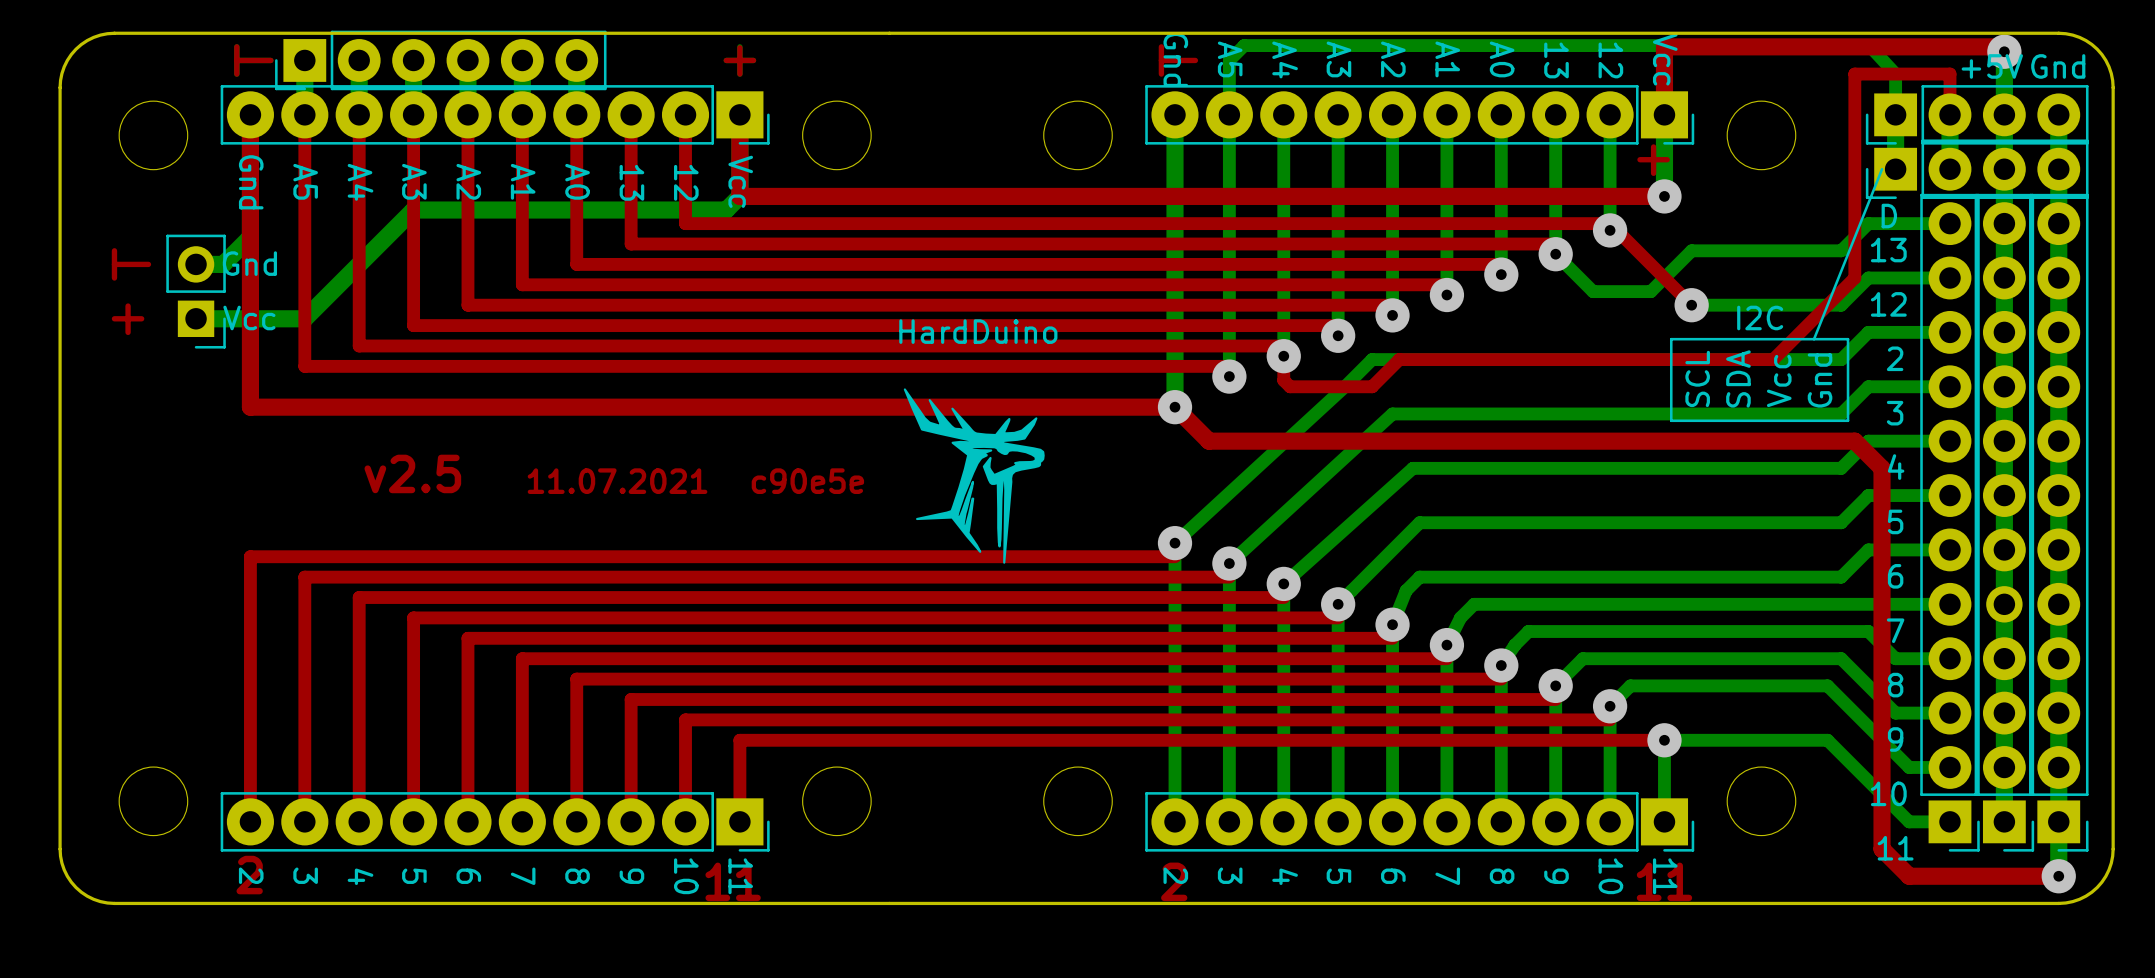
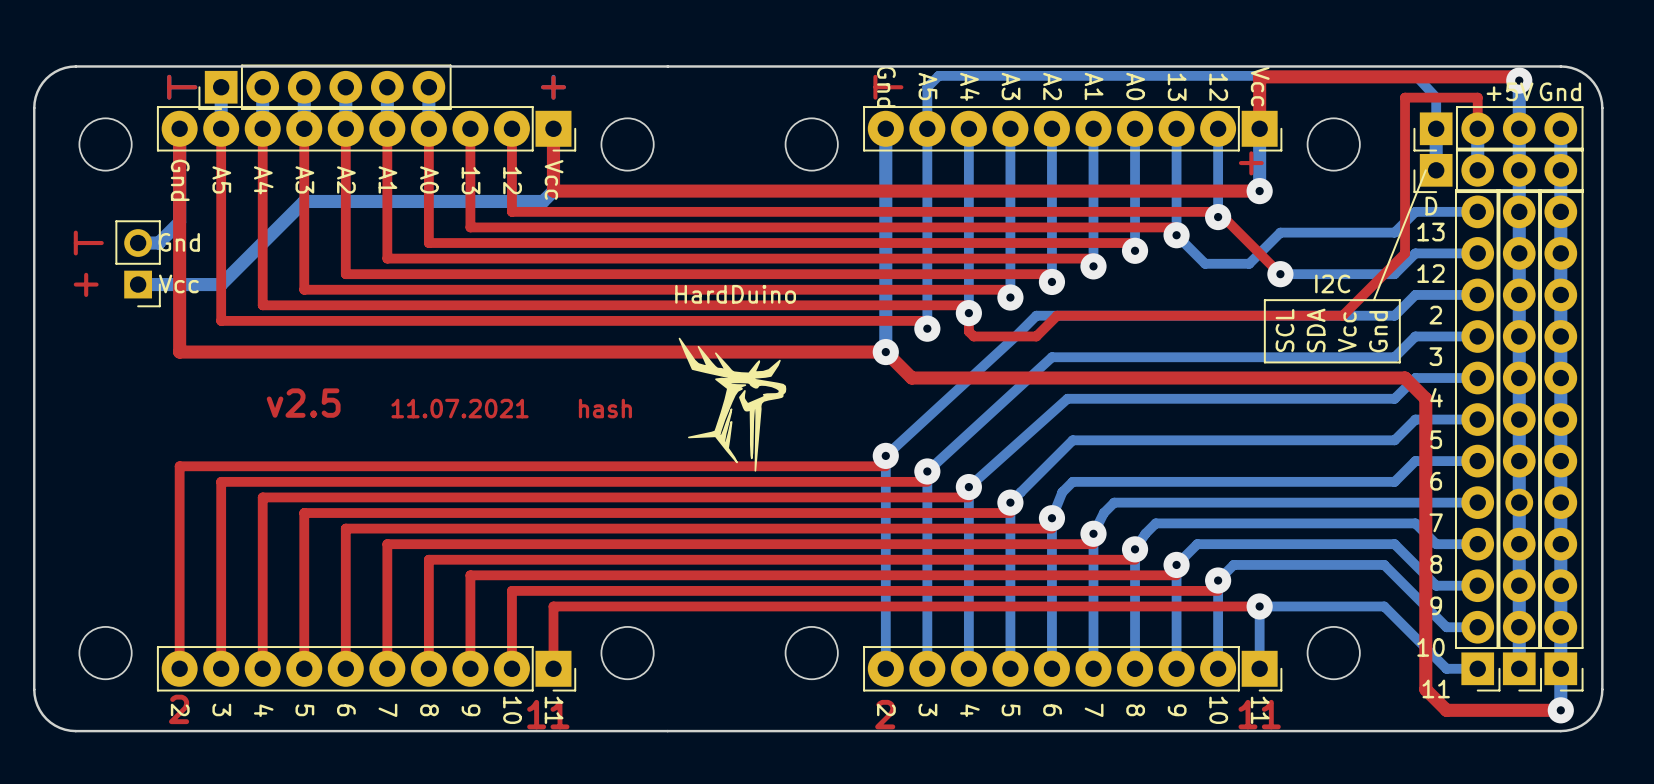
text: c90e5e (807, 481) -> hash (605, 408)

